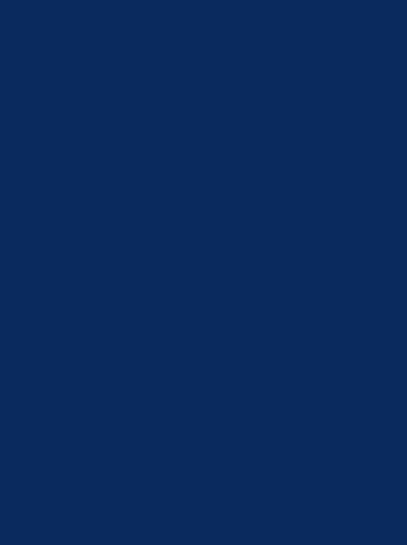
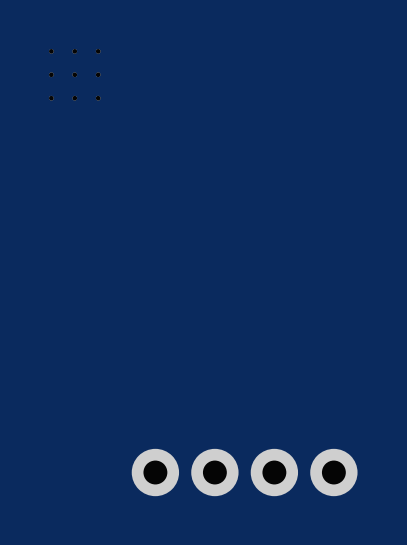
part: none -> (74, 74)
part: none -> (244, 472)

